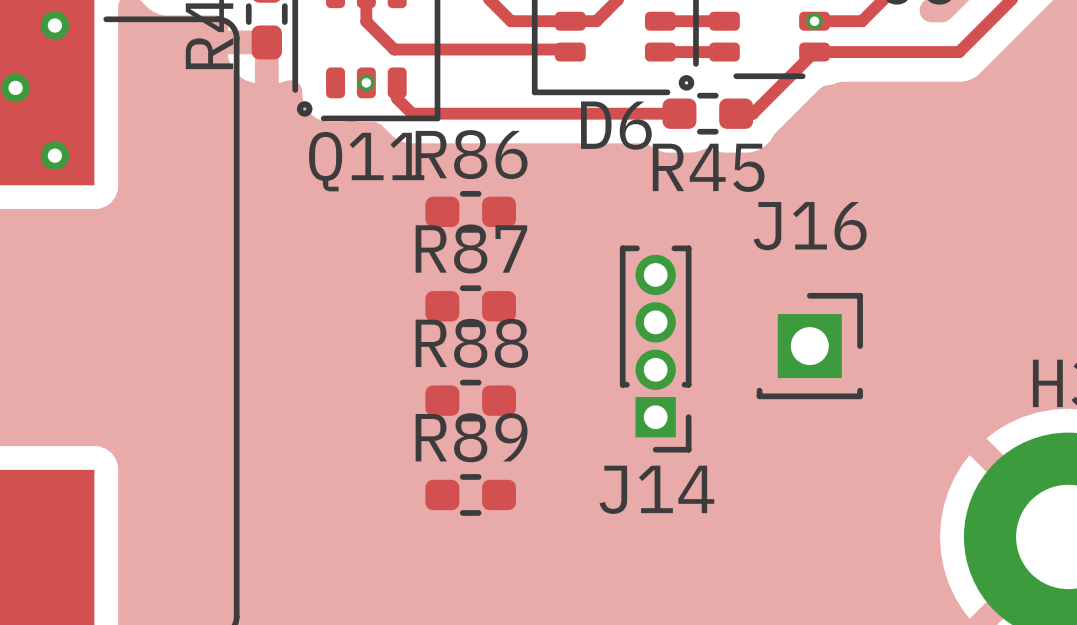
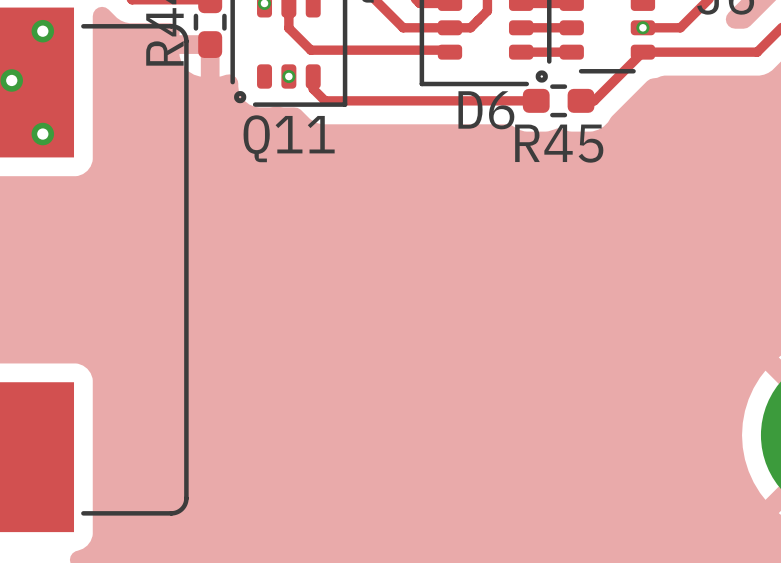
R86: (470, 211) -> none
R87: (470, 306) -> none
J16: (809, 346) -> none
J14: (655, 349) -> none
R88: (470, 400) -> none
R89: (470, 494) -> none

